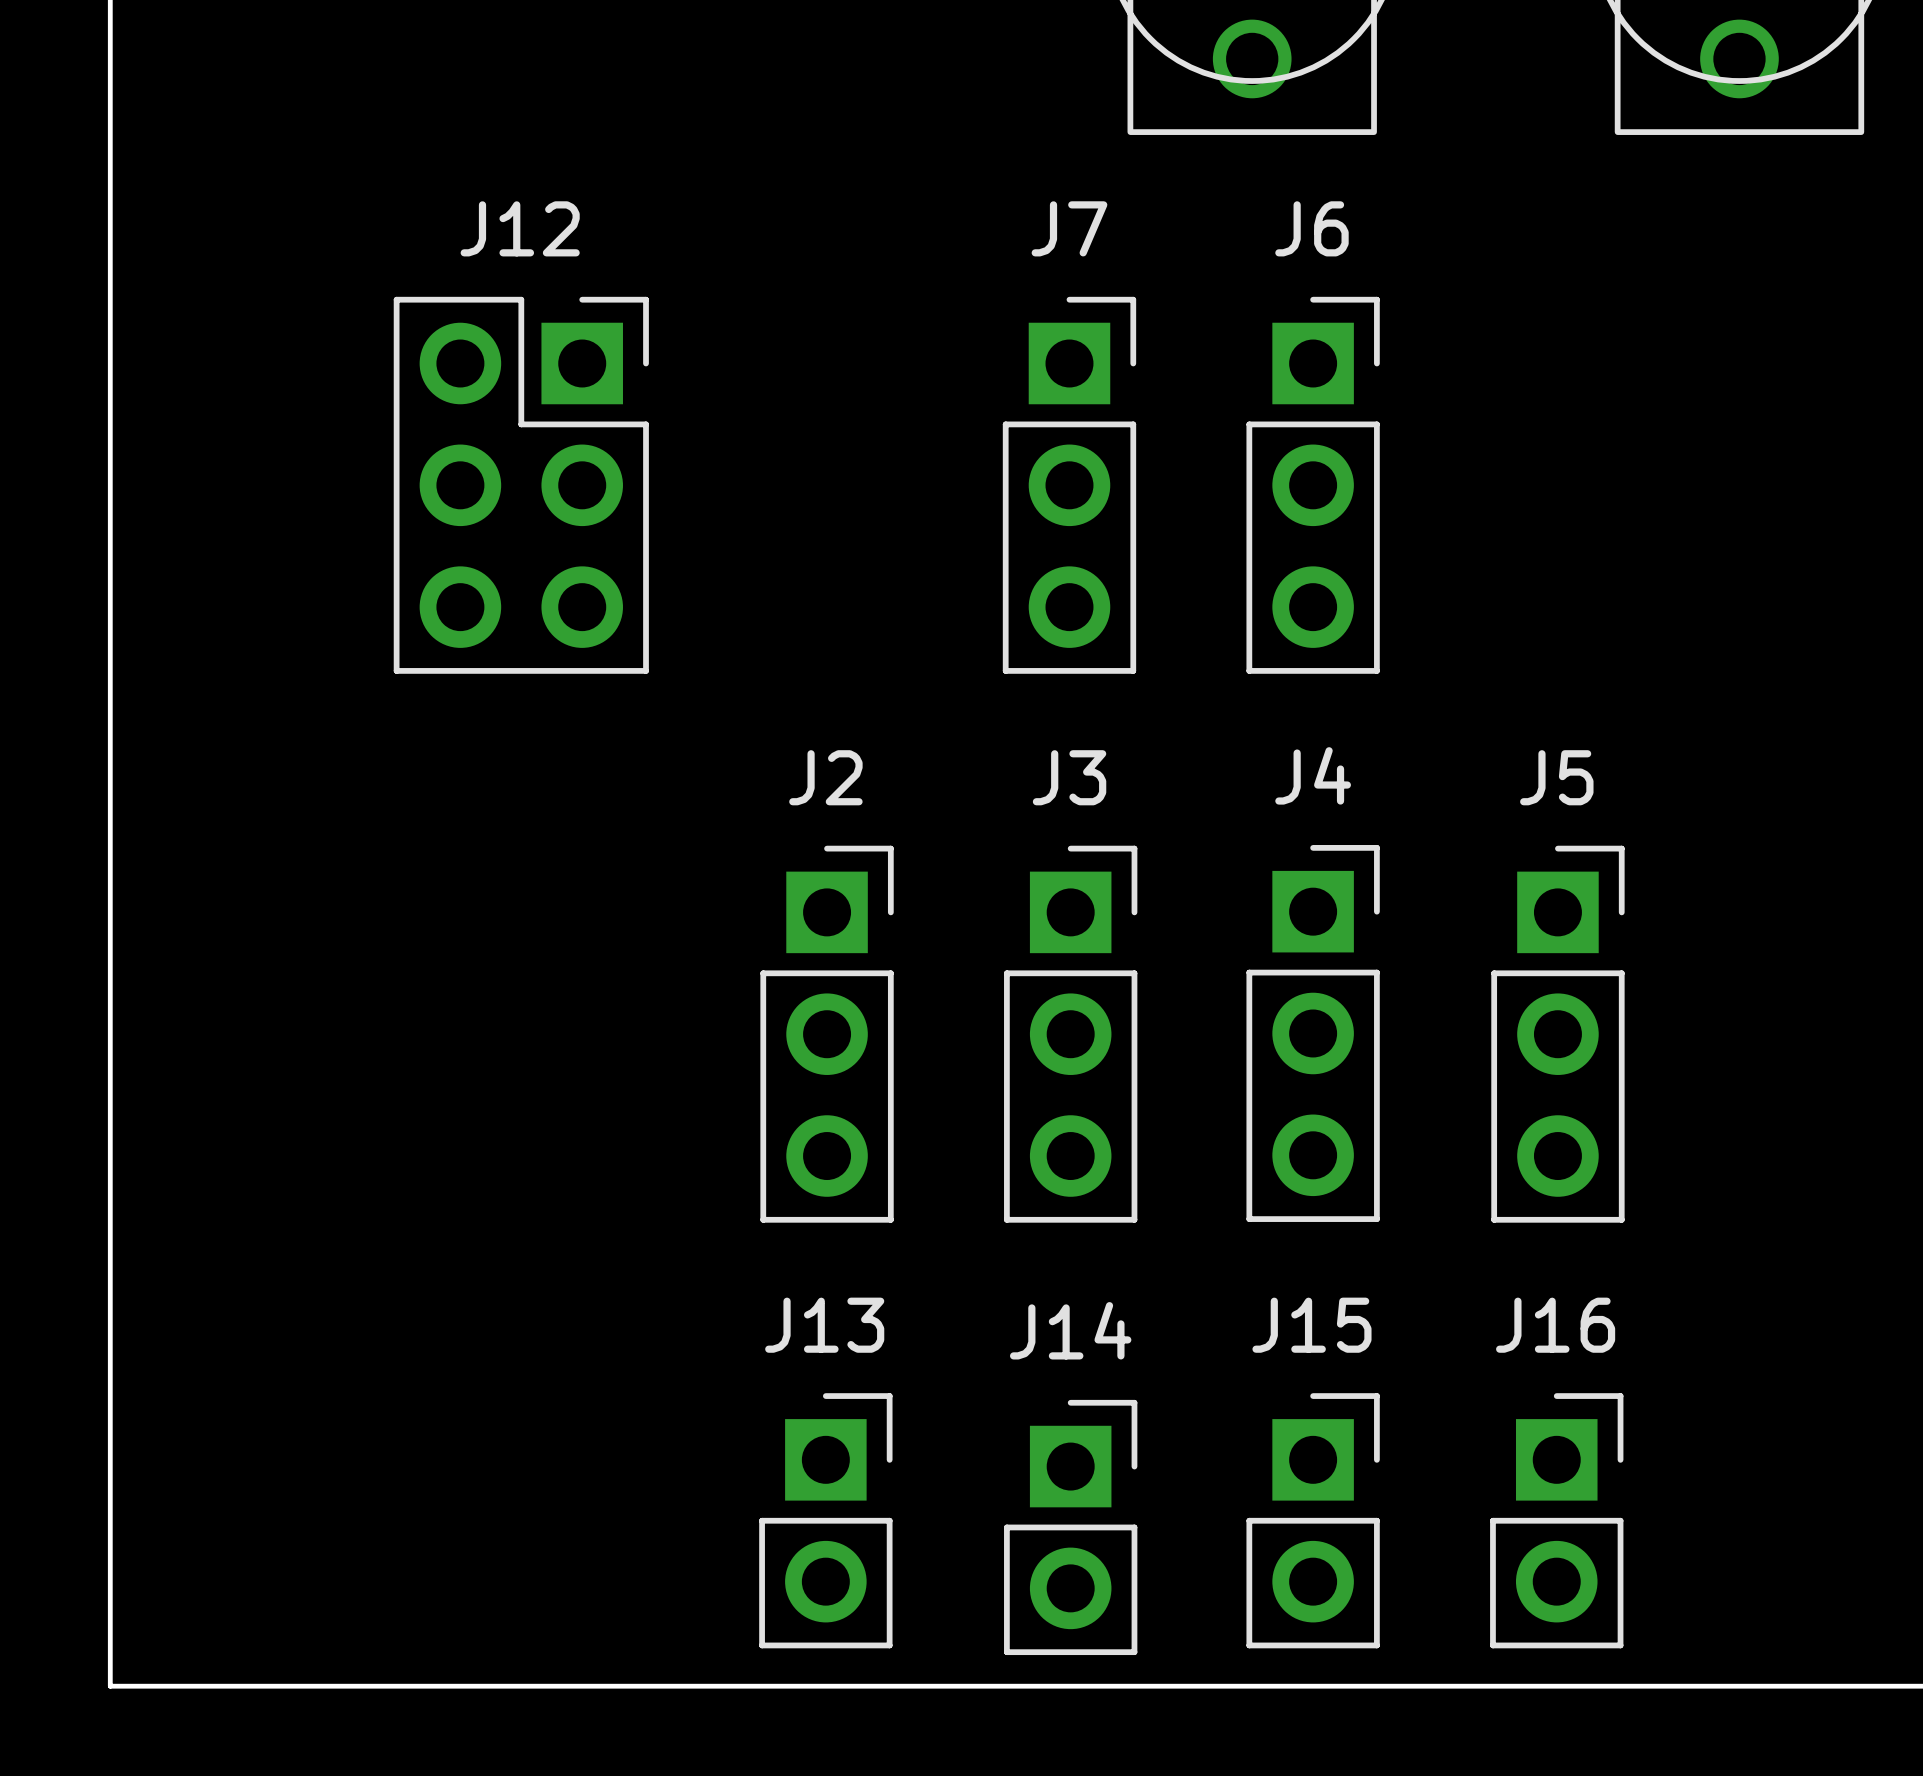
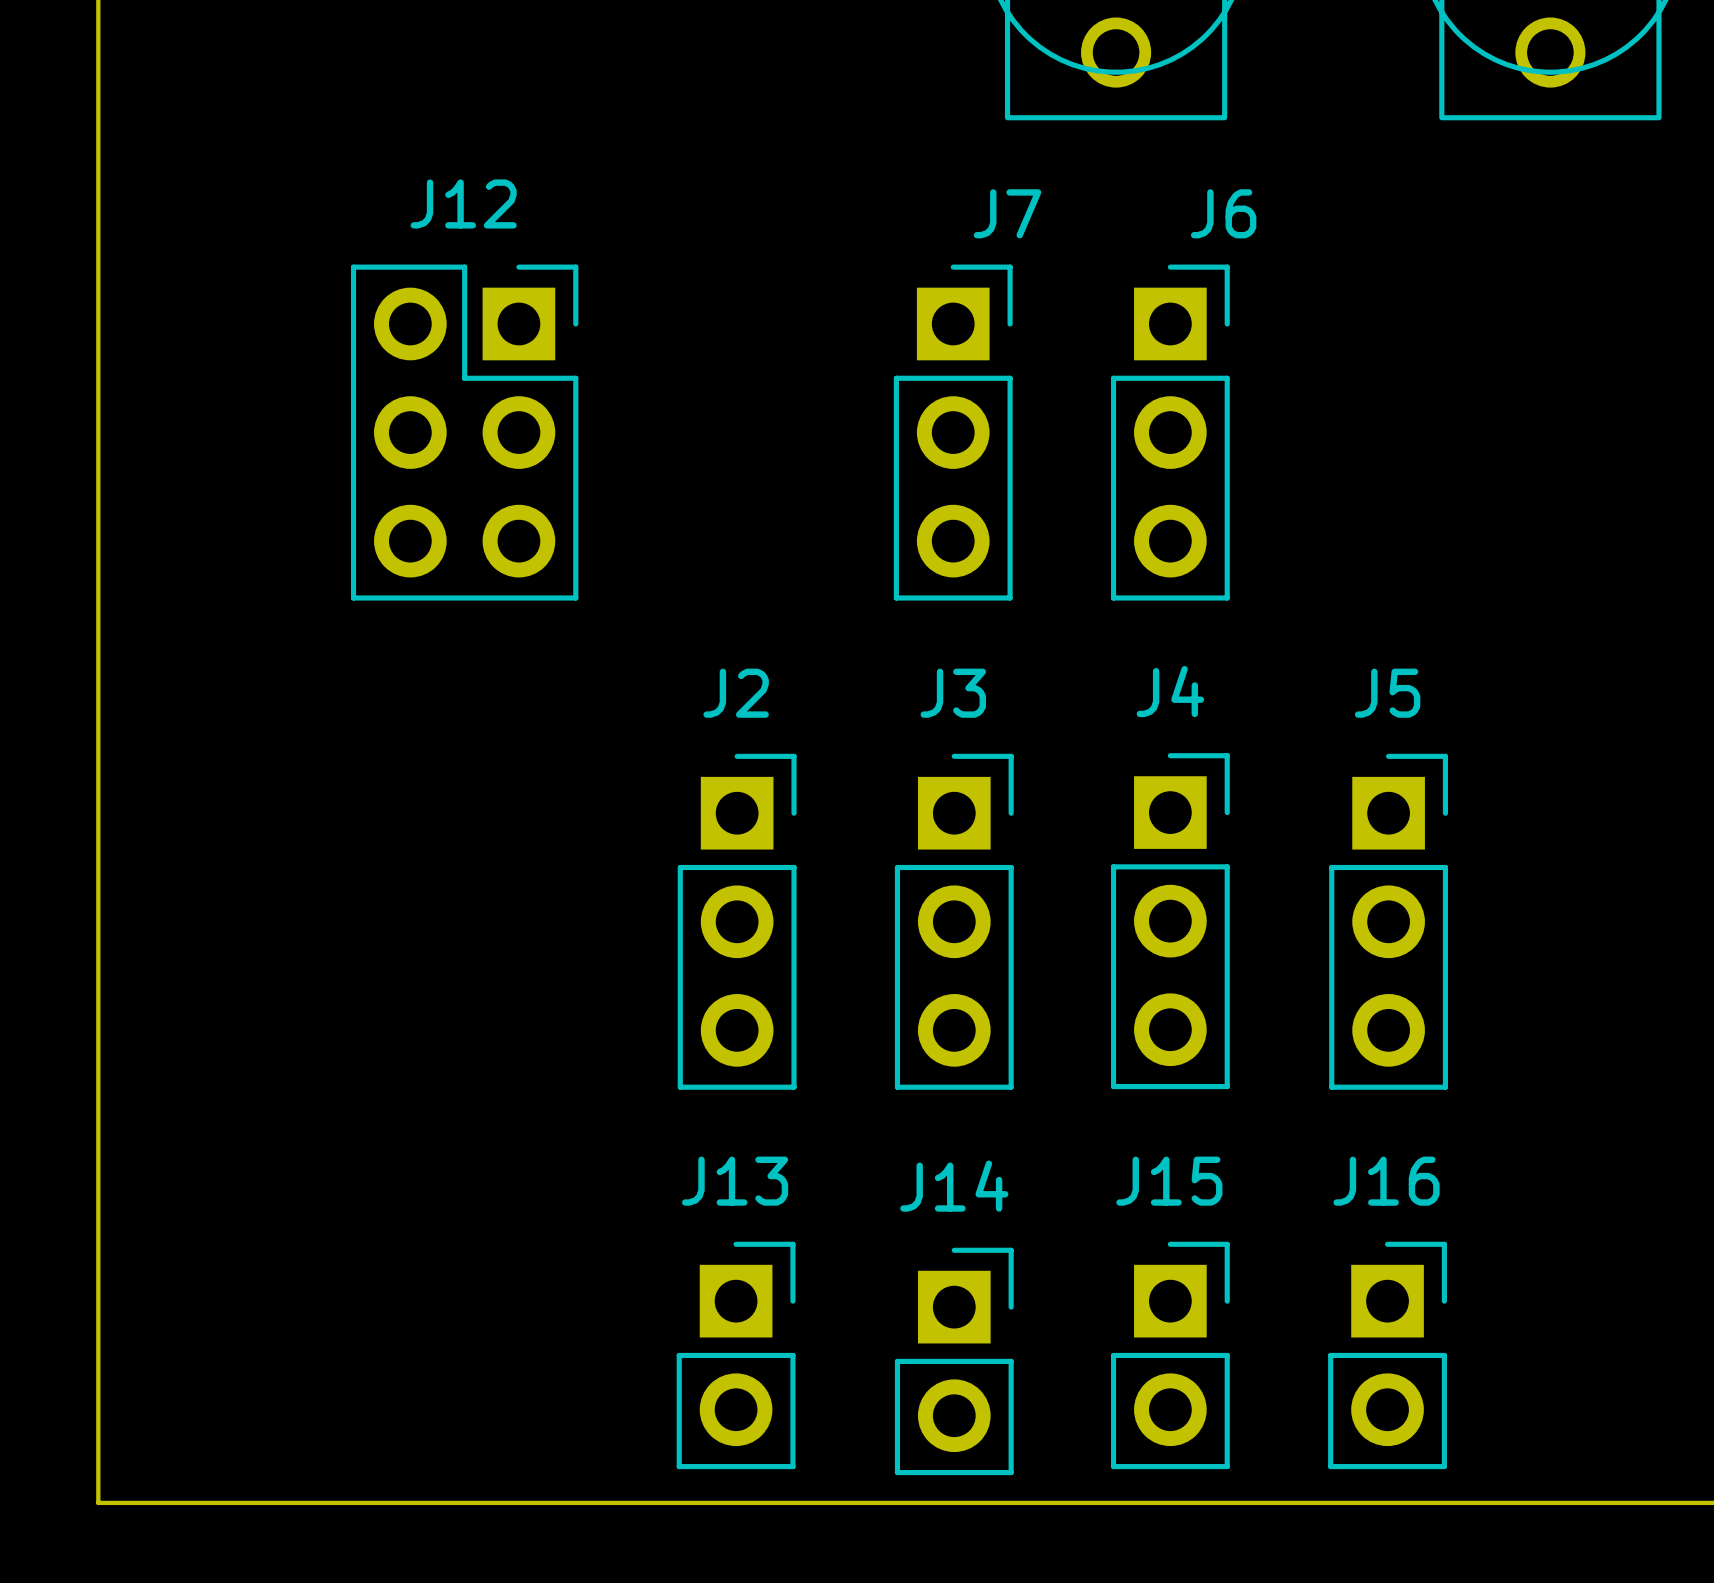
J7 name position: J7 (1069, 228) -> J7 (1007, 213)
J6 name position: J6 (1311, 228) -> J6 (1223, 213)

